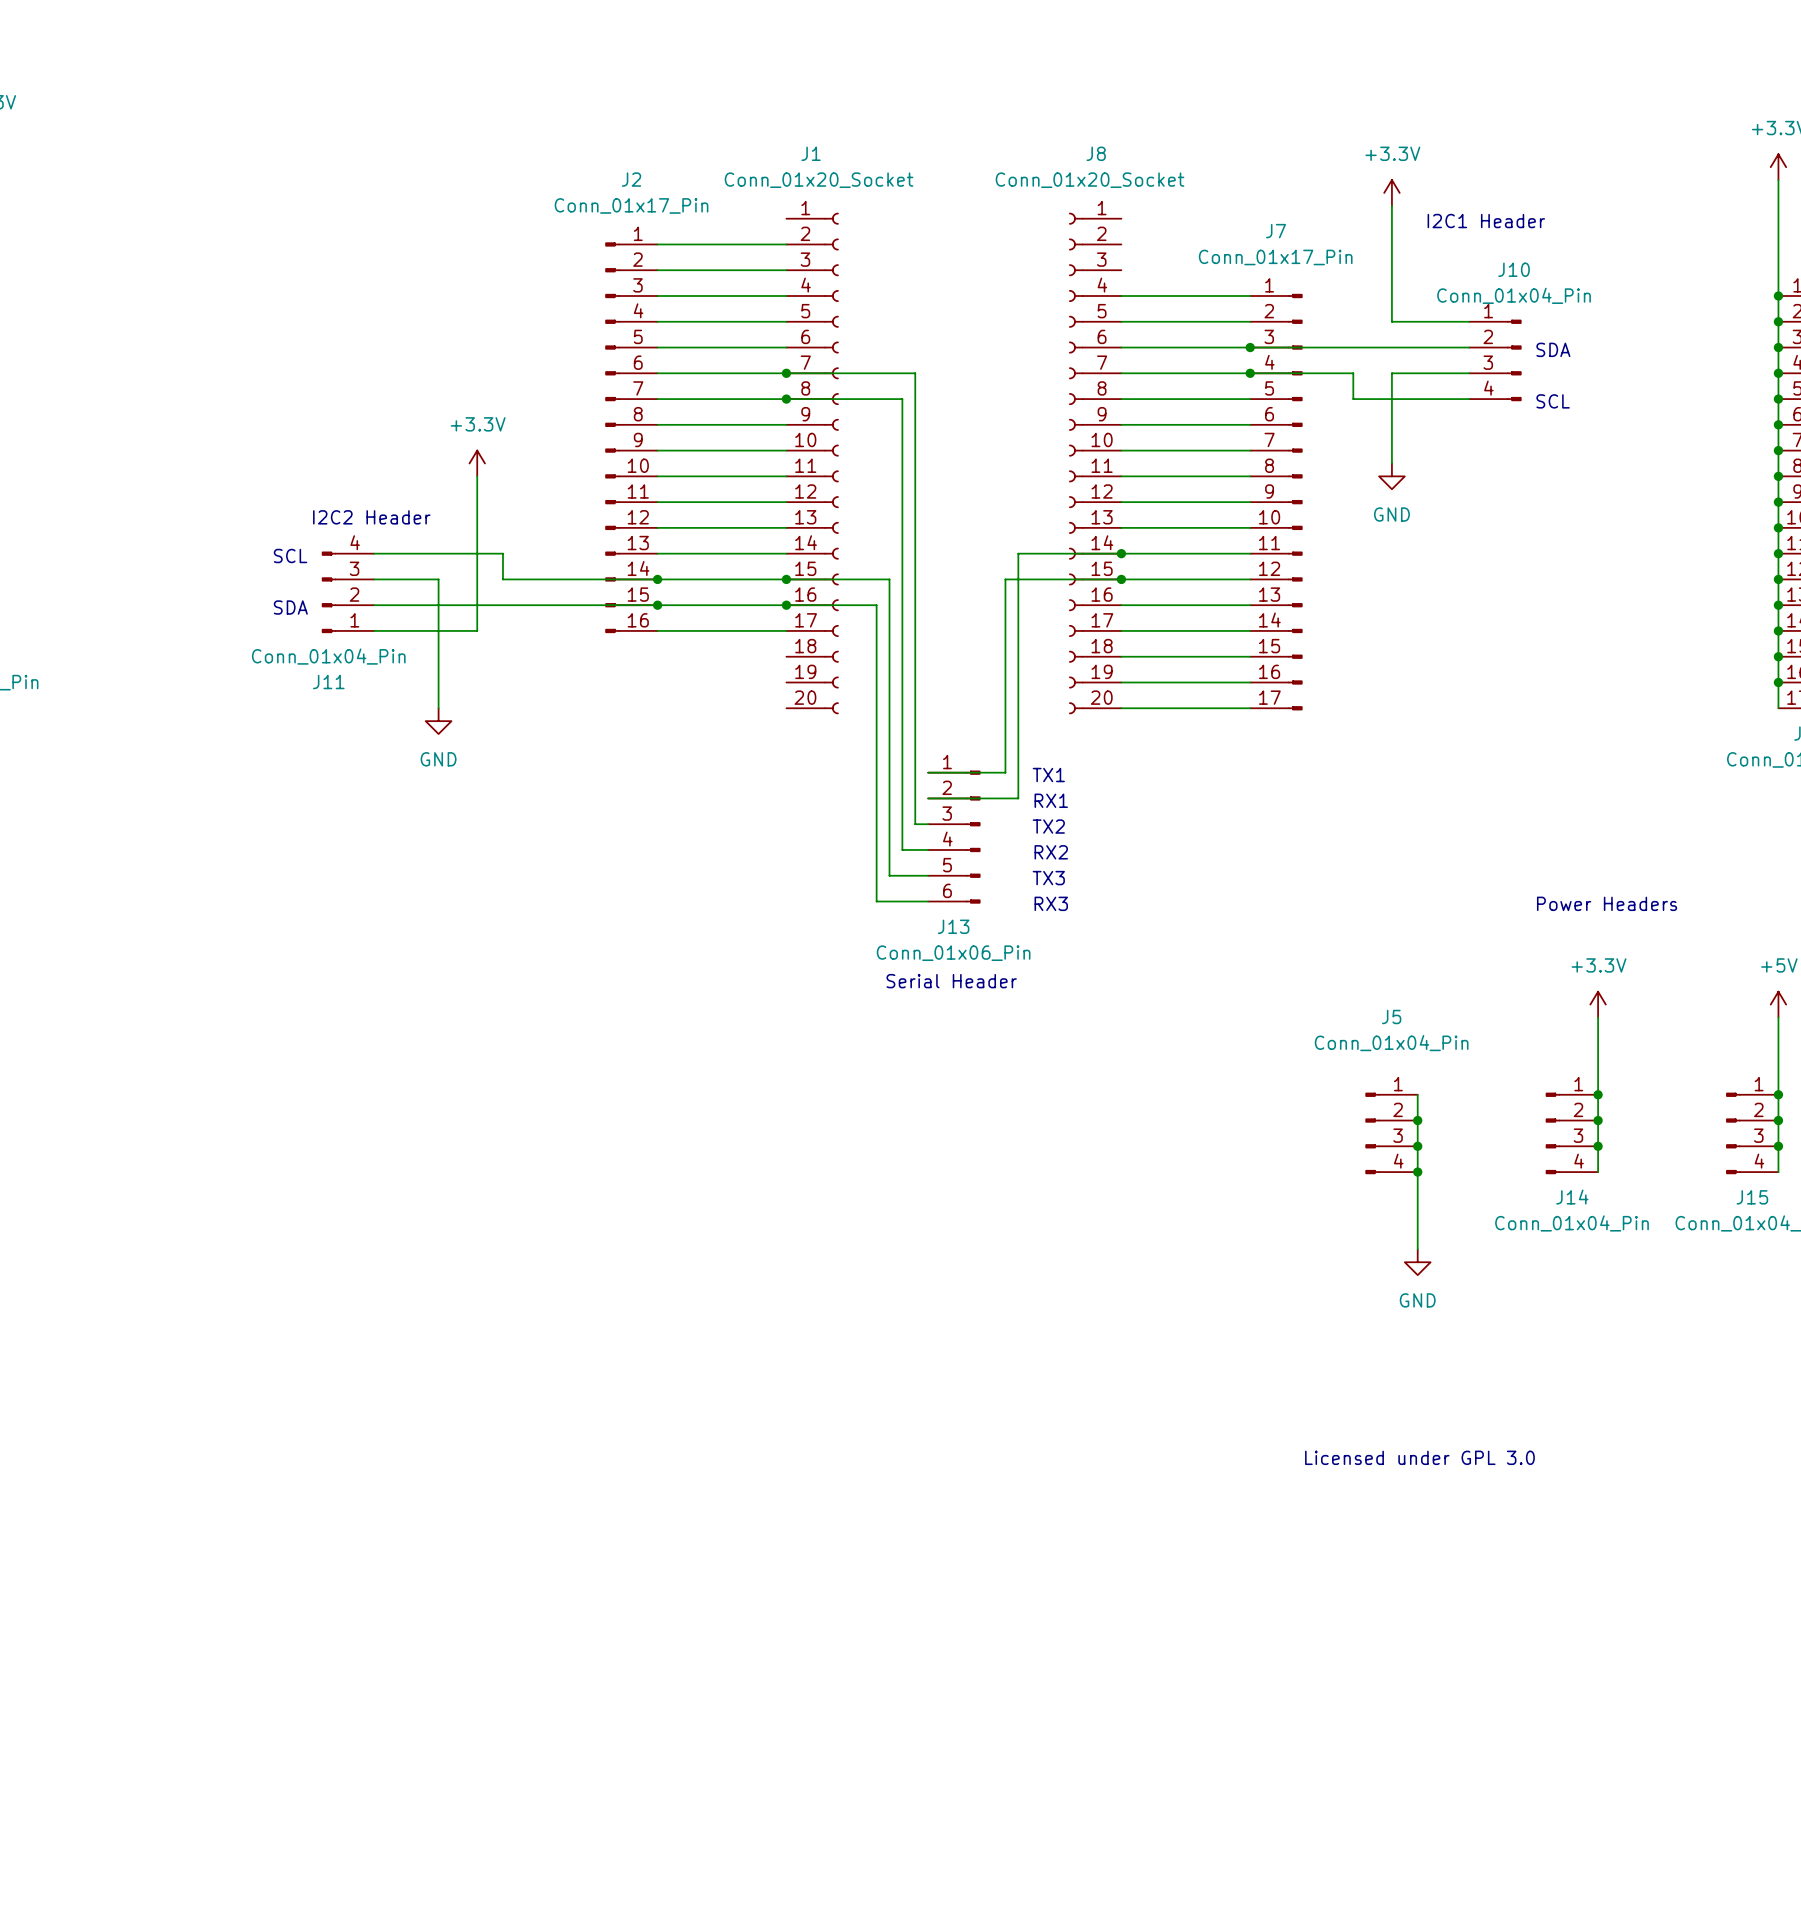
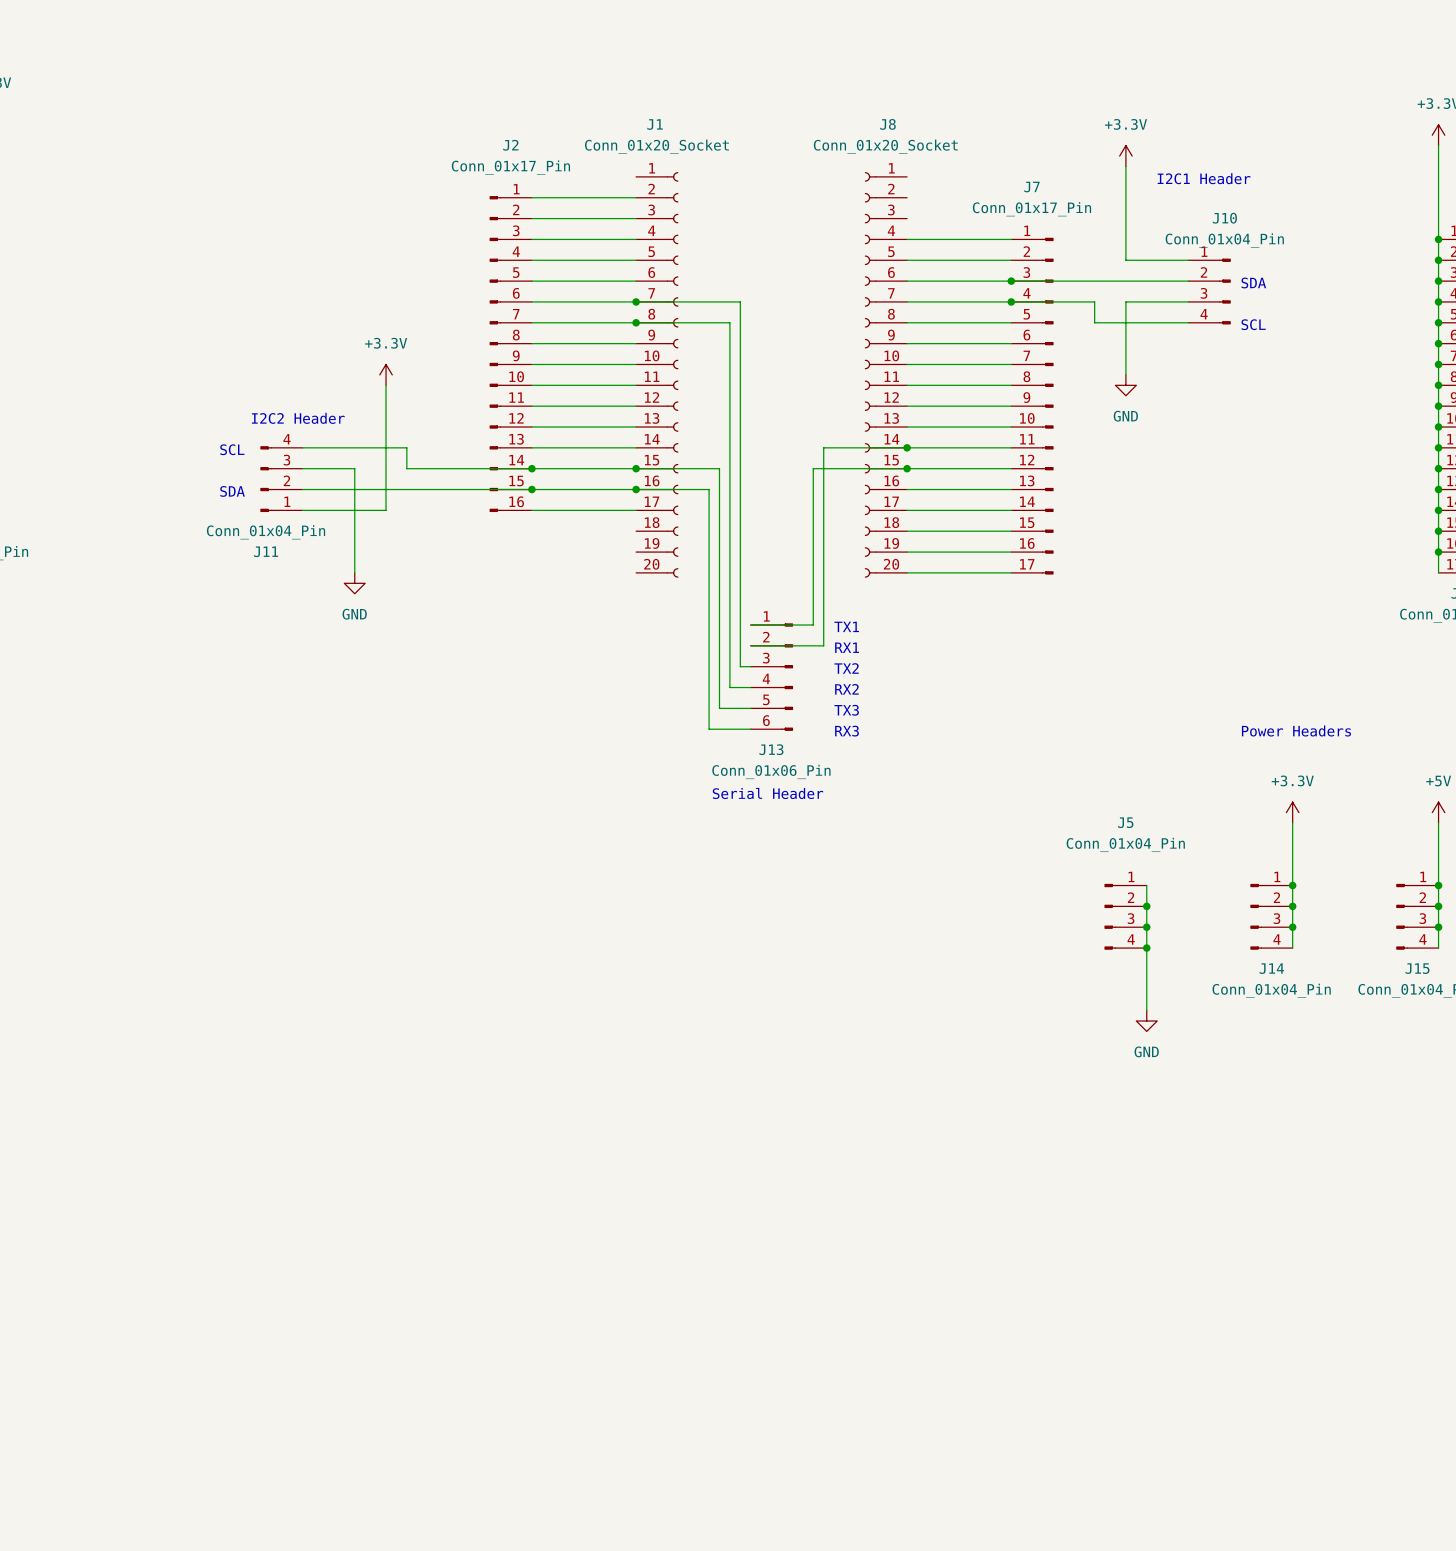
text: Licensed under GPL 3.0 (1419, 1457) -> none

